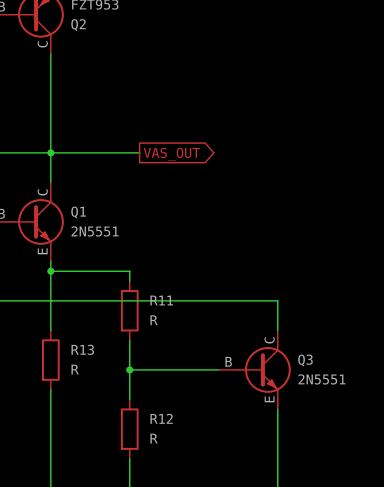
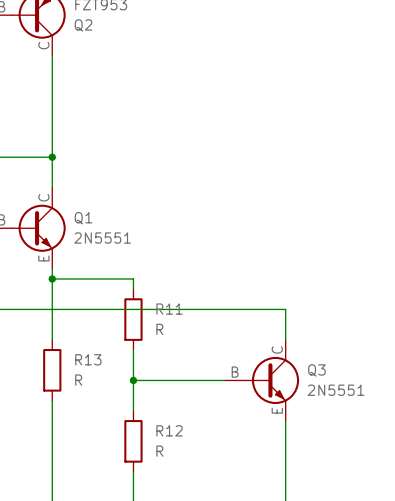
wire: (50, 152) (139, 152) -> none
global label: VAS_OUT (171, 154) -> none

